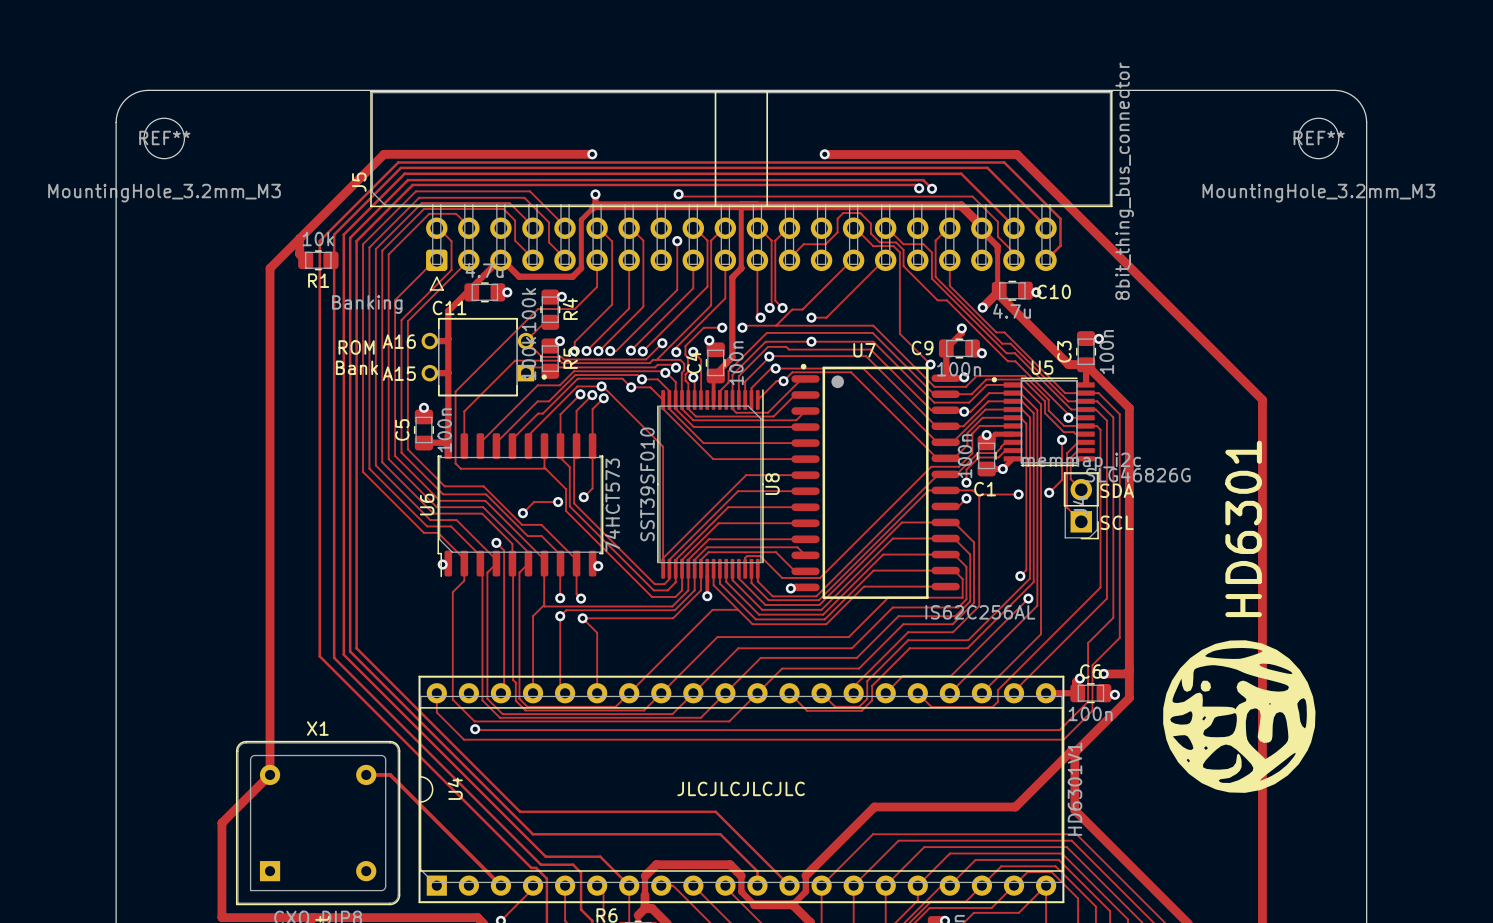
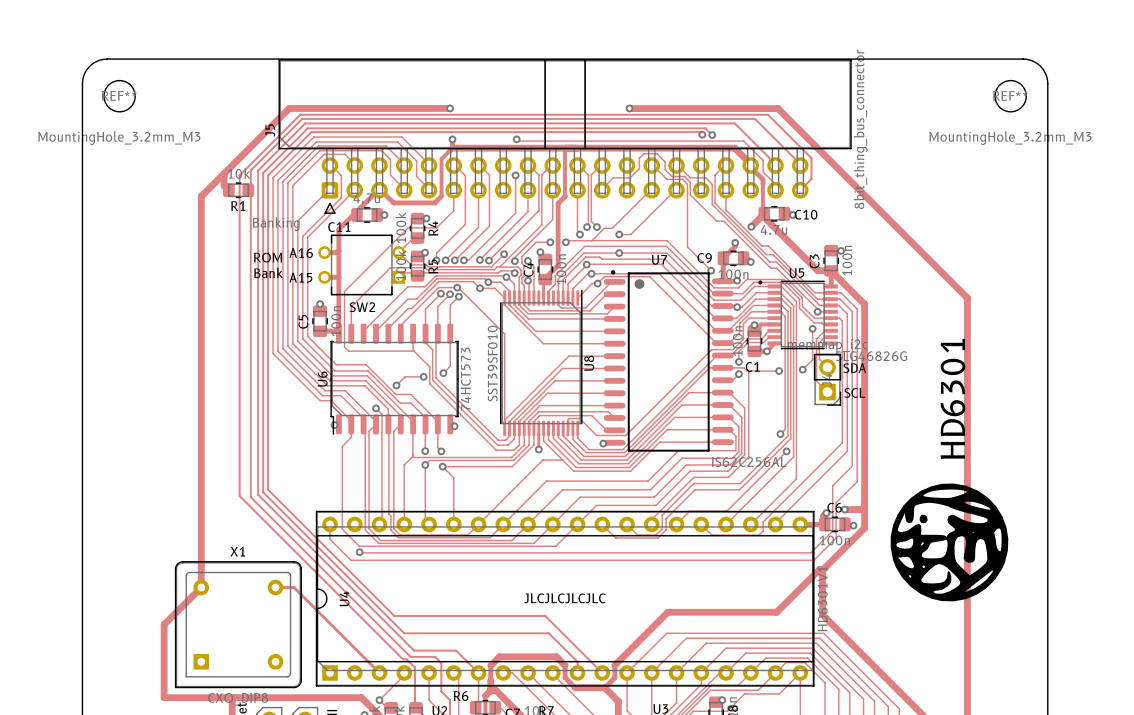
SW2: none -> Banking (361, 264)
part: Banking (484, 357) -> none

